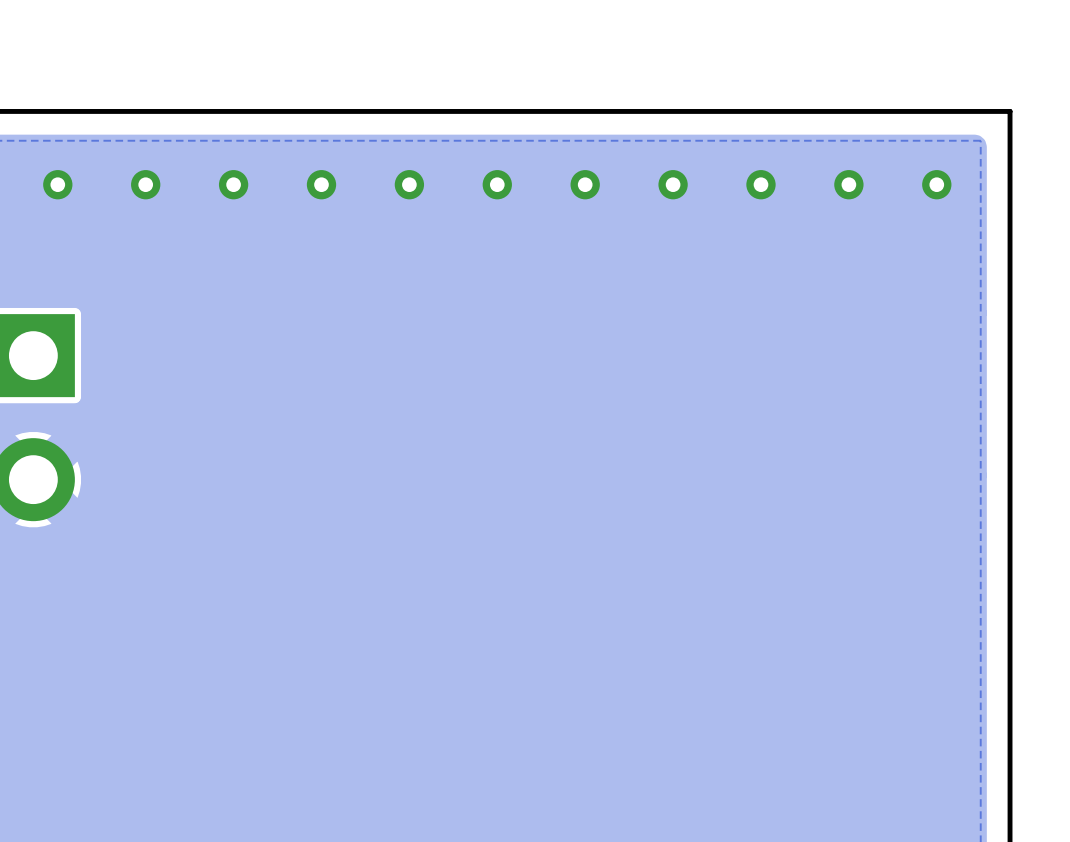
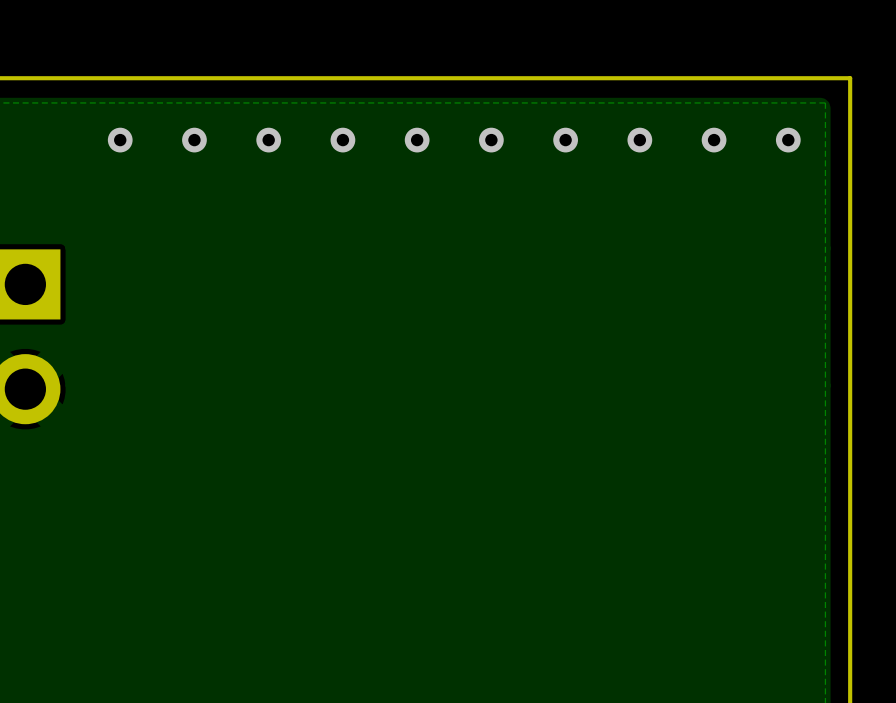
via: (57, 184) -> none

